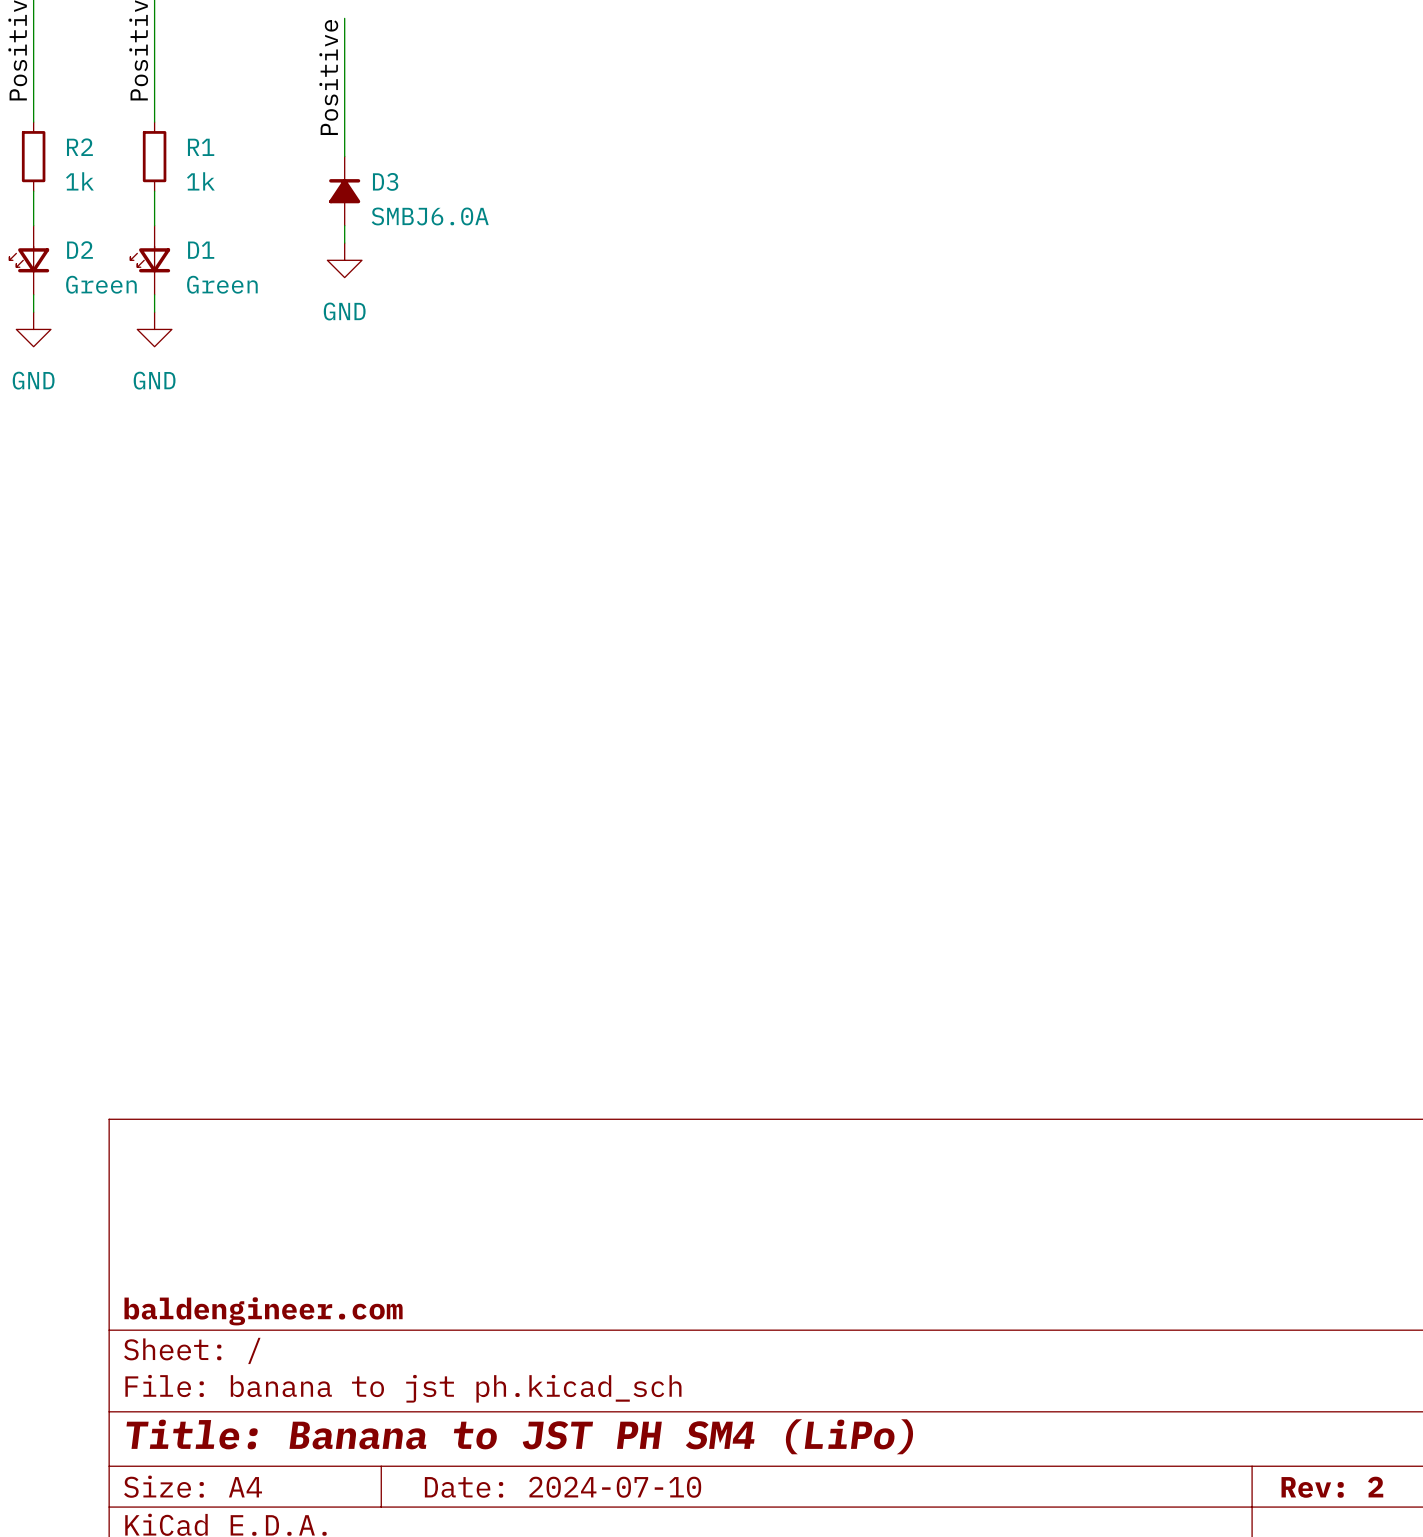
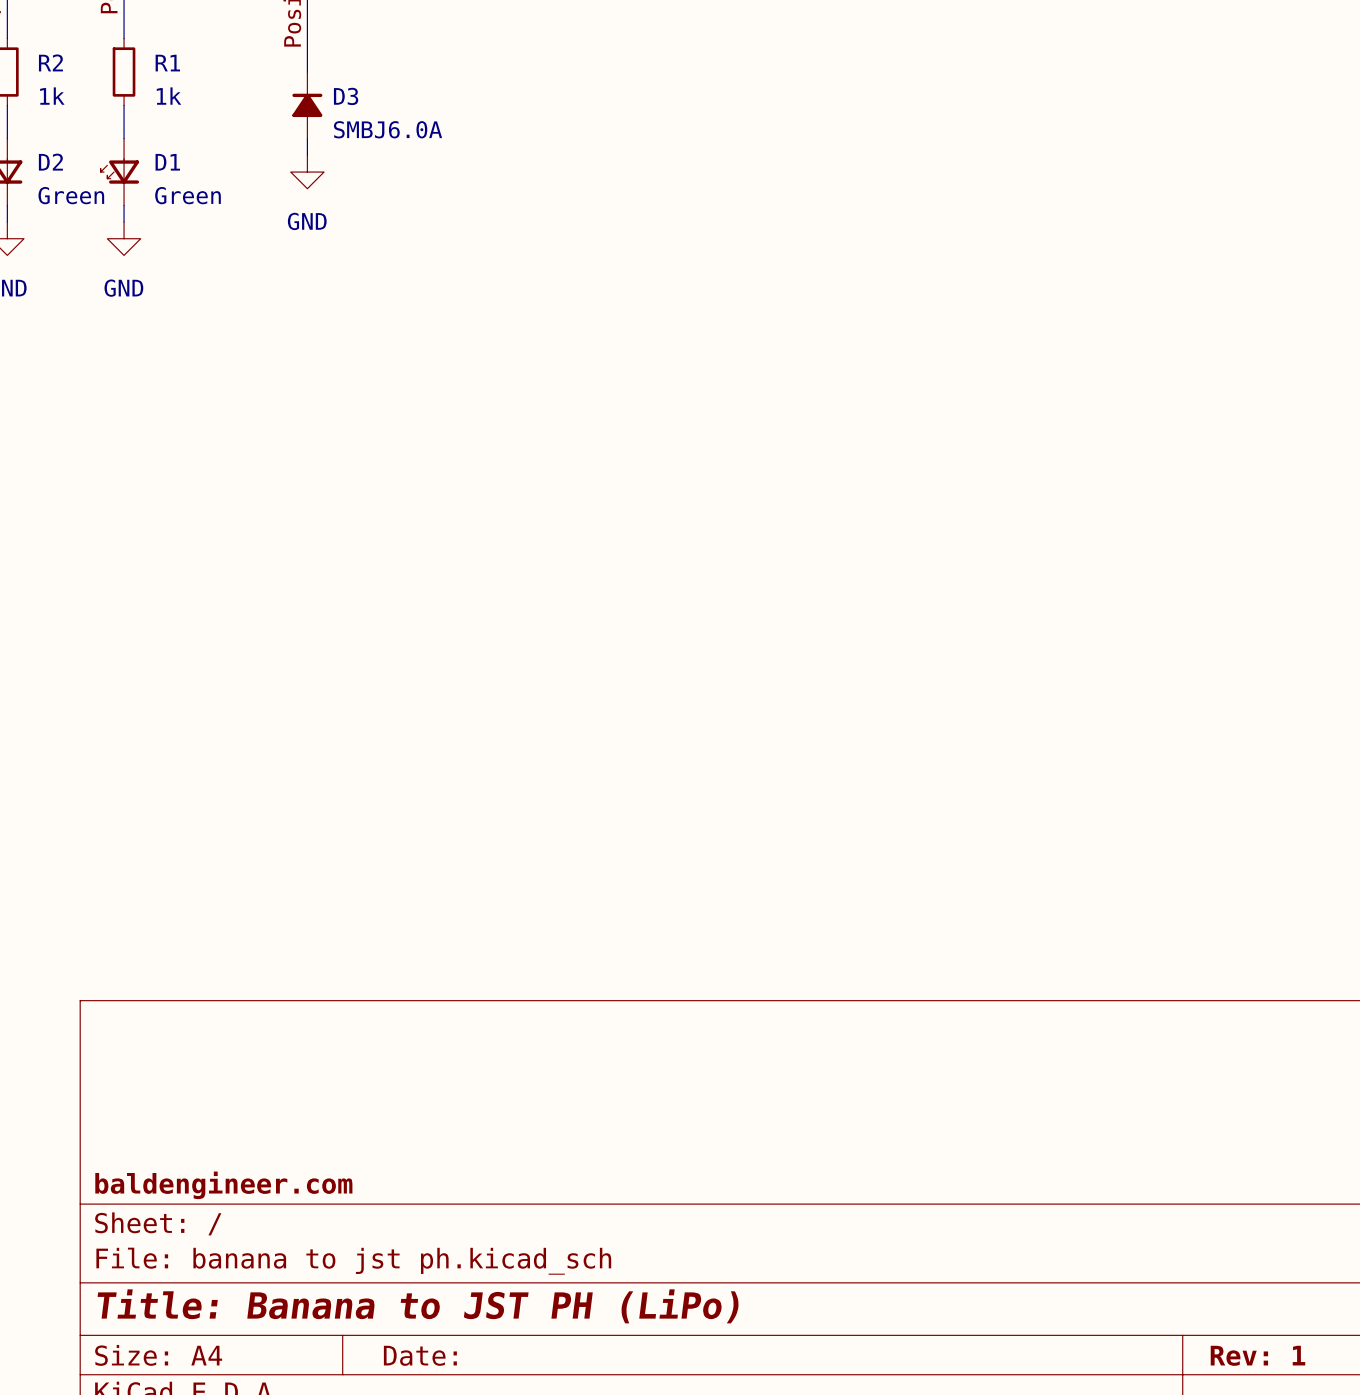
title block: Title: Banana to JST PH SM4 (LiPo) (519, 1436) -> Title: Banana to JST PH (LiPo) (418, 1306)
title block: Date: 2024-07-10 (563, 1487) -> Date: (420, 1355)
title block: Rev: 2 (1332, 1487) -> Rev: 1 (1257, 1355)

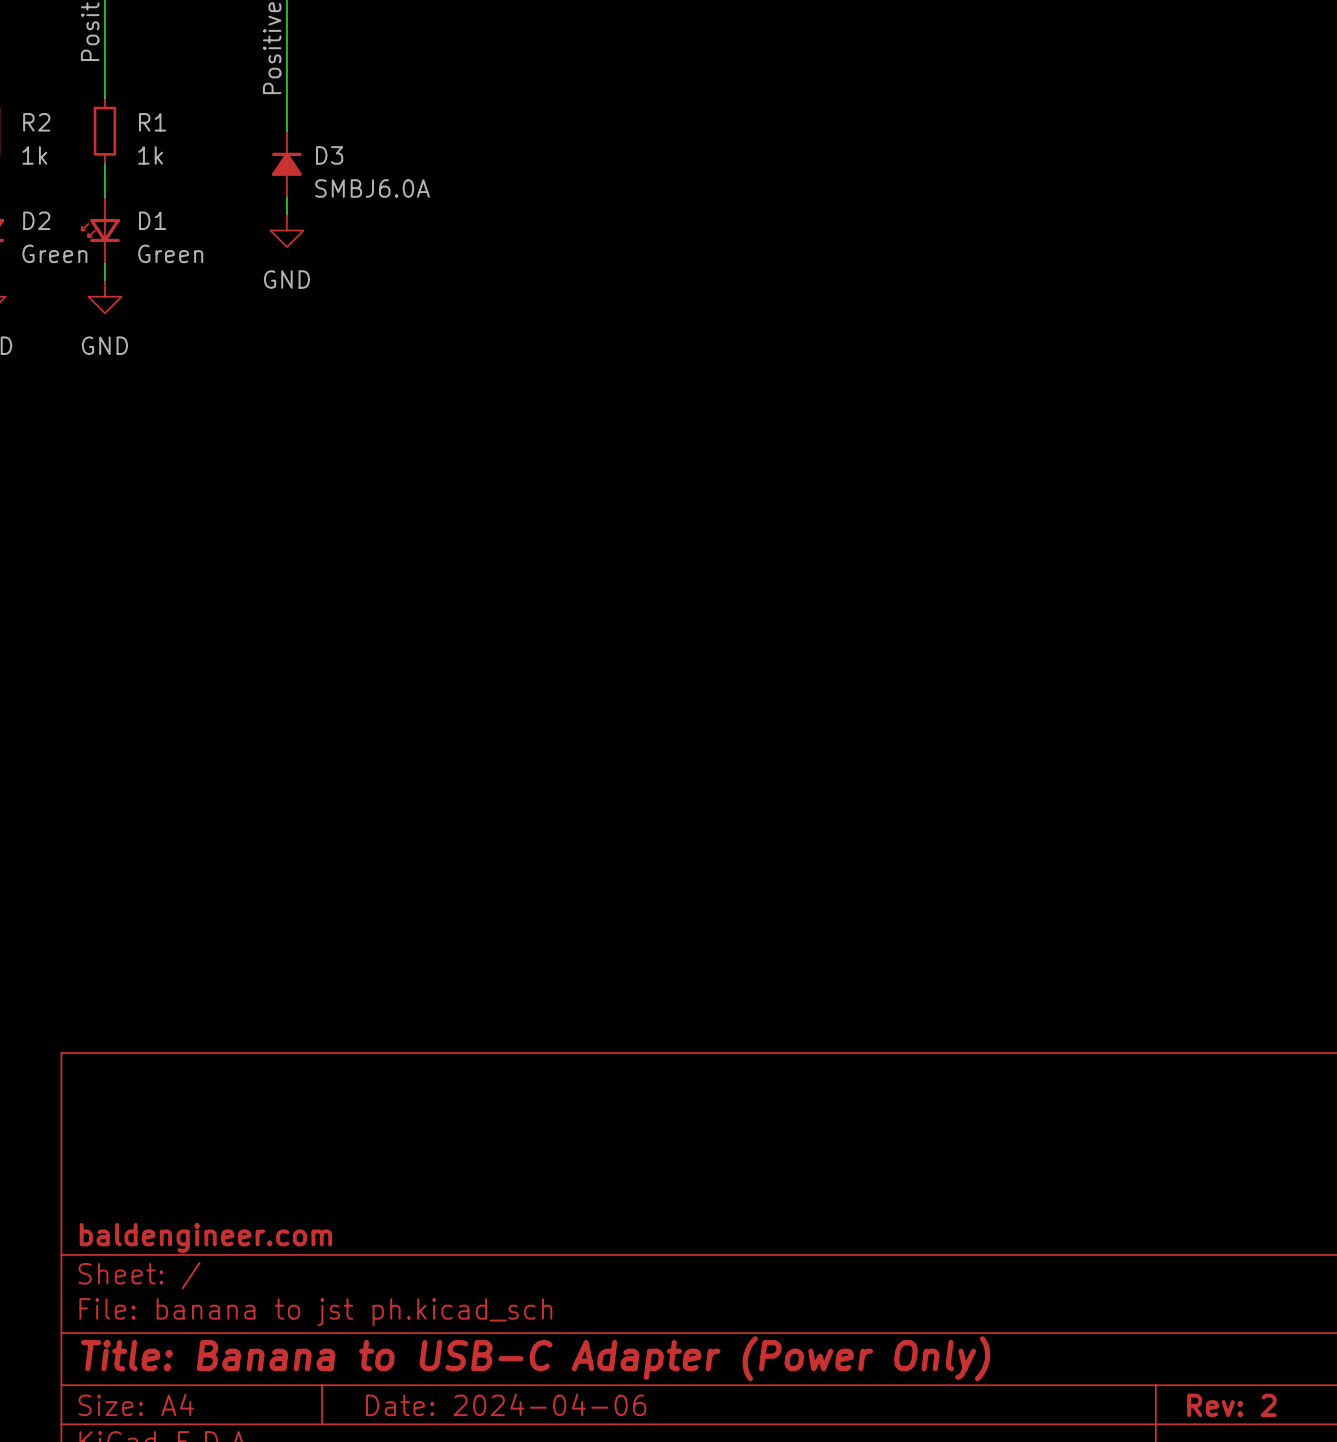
title block: Title: Banana to JST PH (LiPo) (418, 1306) -> Title: Banana to USB-C Adapter (Power Only) (535, 1358)
title block: Date: (420, 1355) -> Date: 2024-04-06 (506, 1404)
title block: Rev: 1 (1257, 1355) -> Rev: 2 (1231, 1405)

